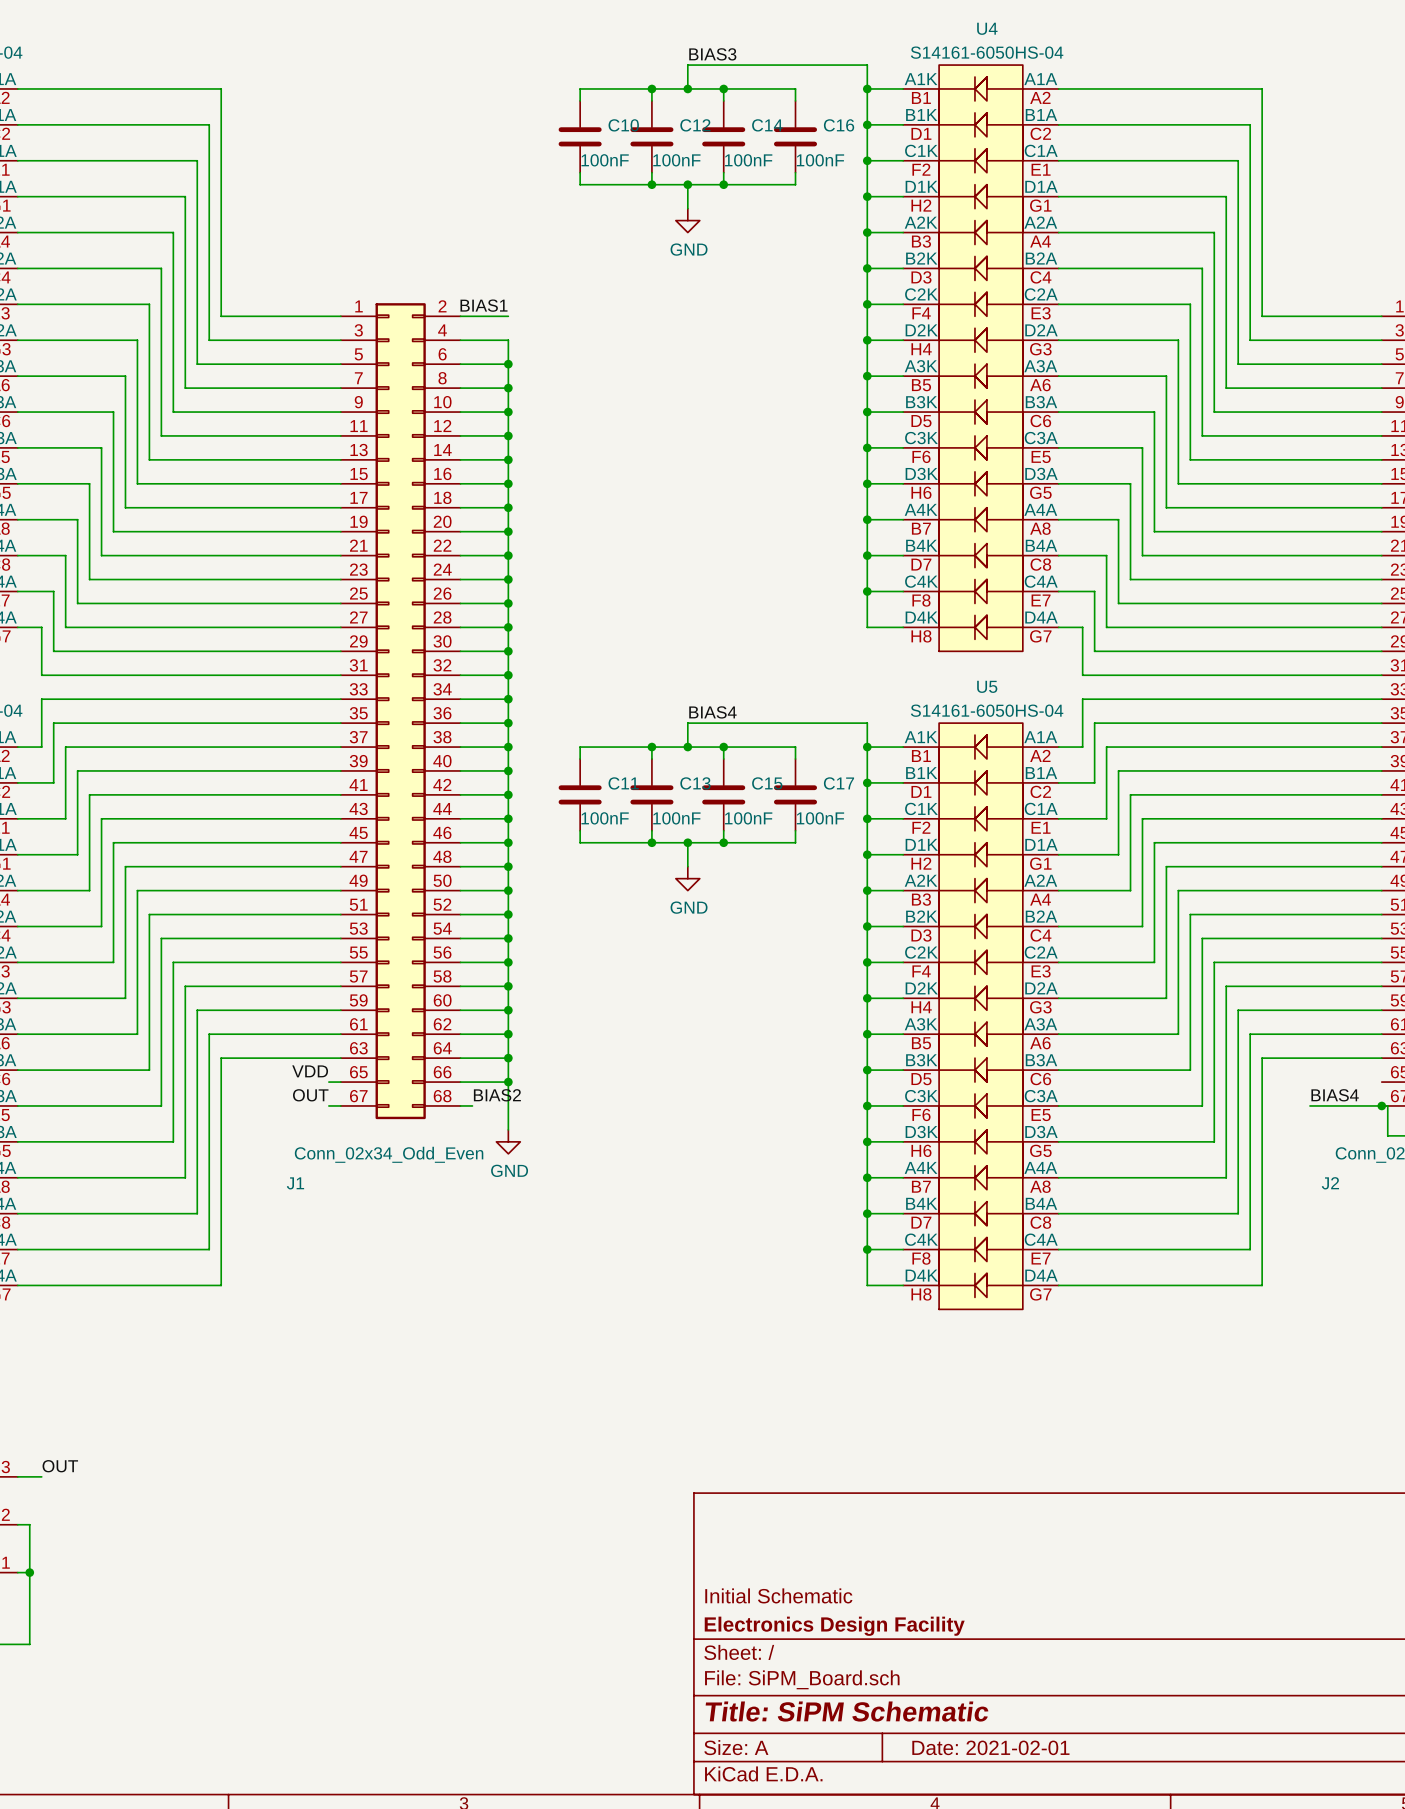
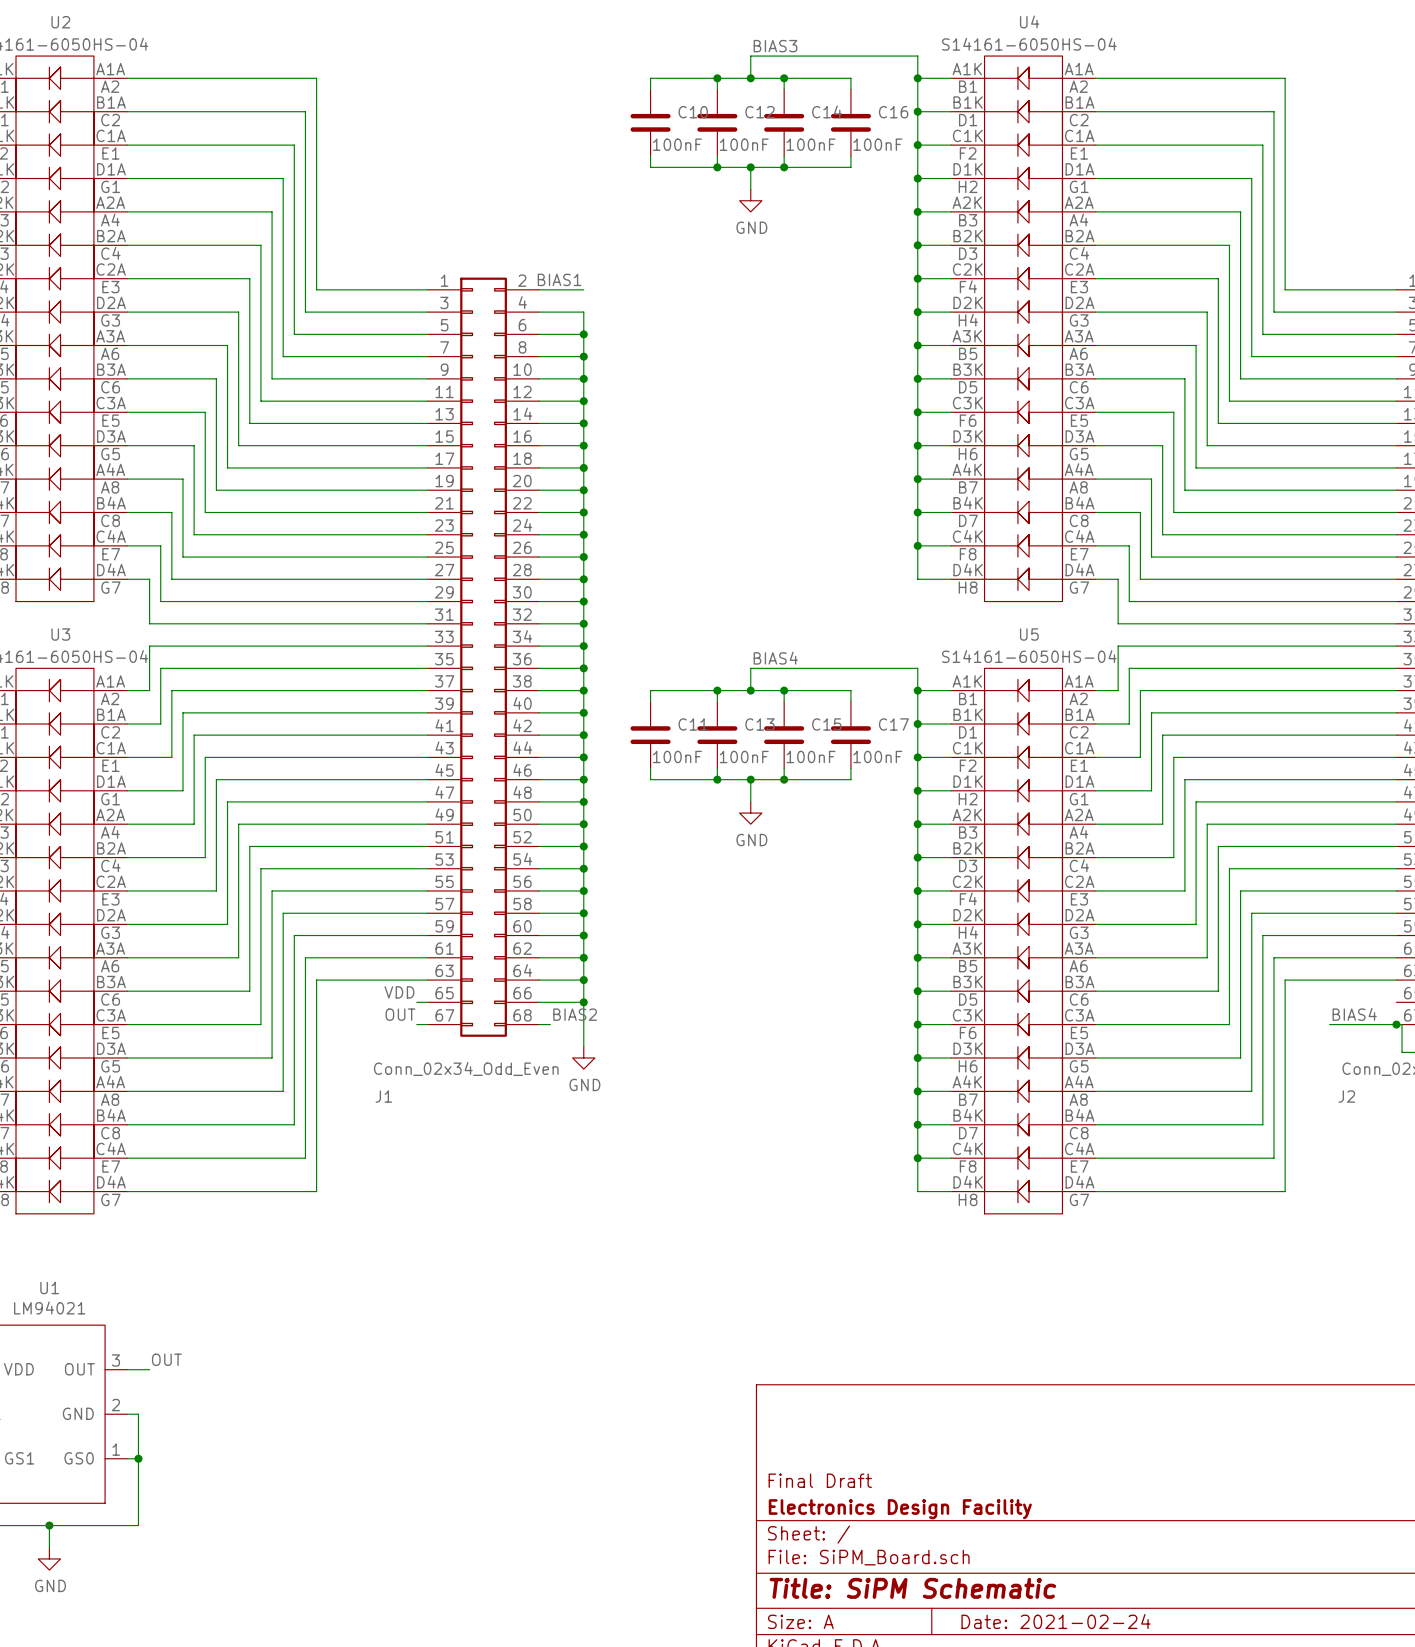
title block: Initial Schematic (778, 1595) -> Final Draft (820, 1480)
title block: Date: 2021-02-01 (990, 1747) -> Date: 2021-02-24 (1056, 1621)

